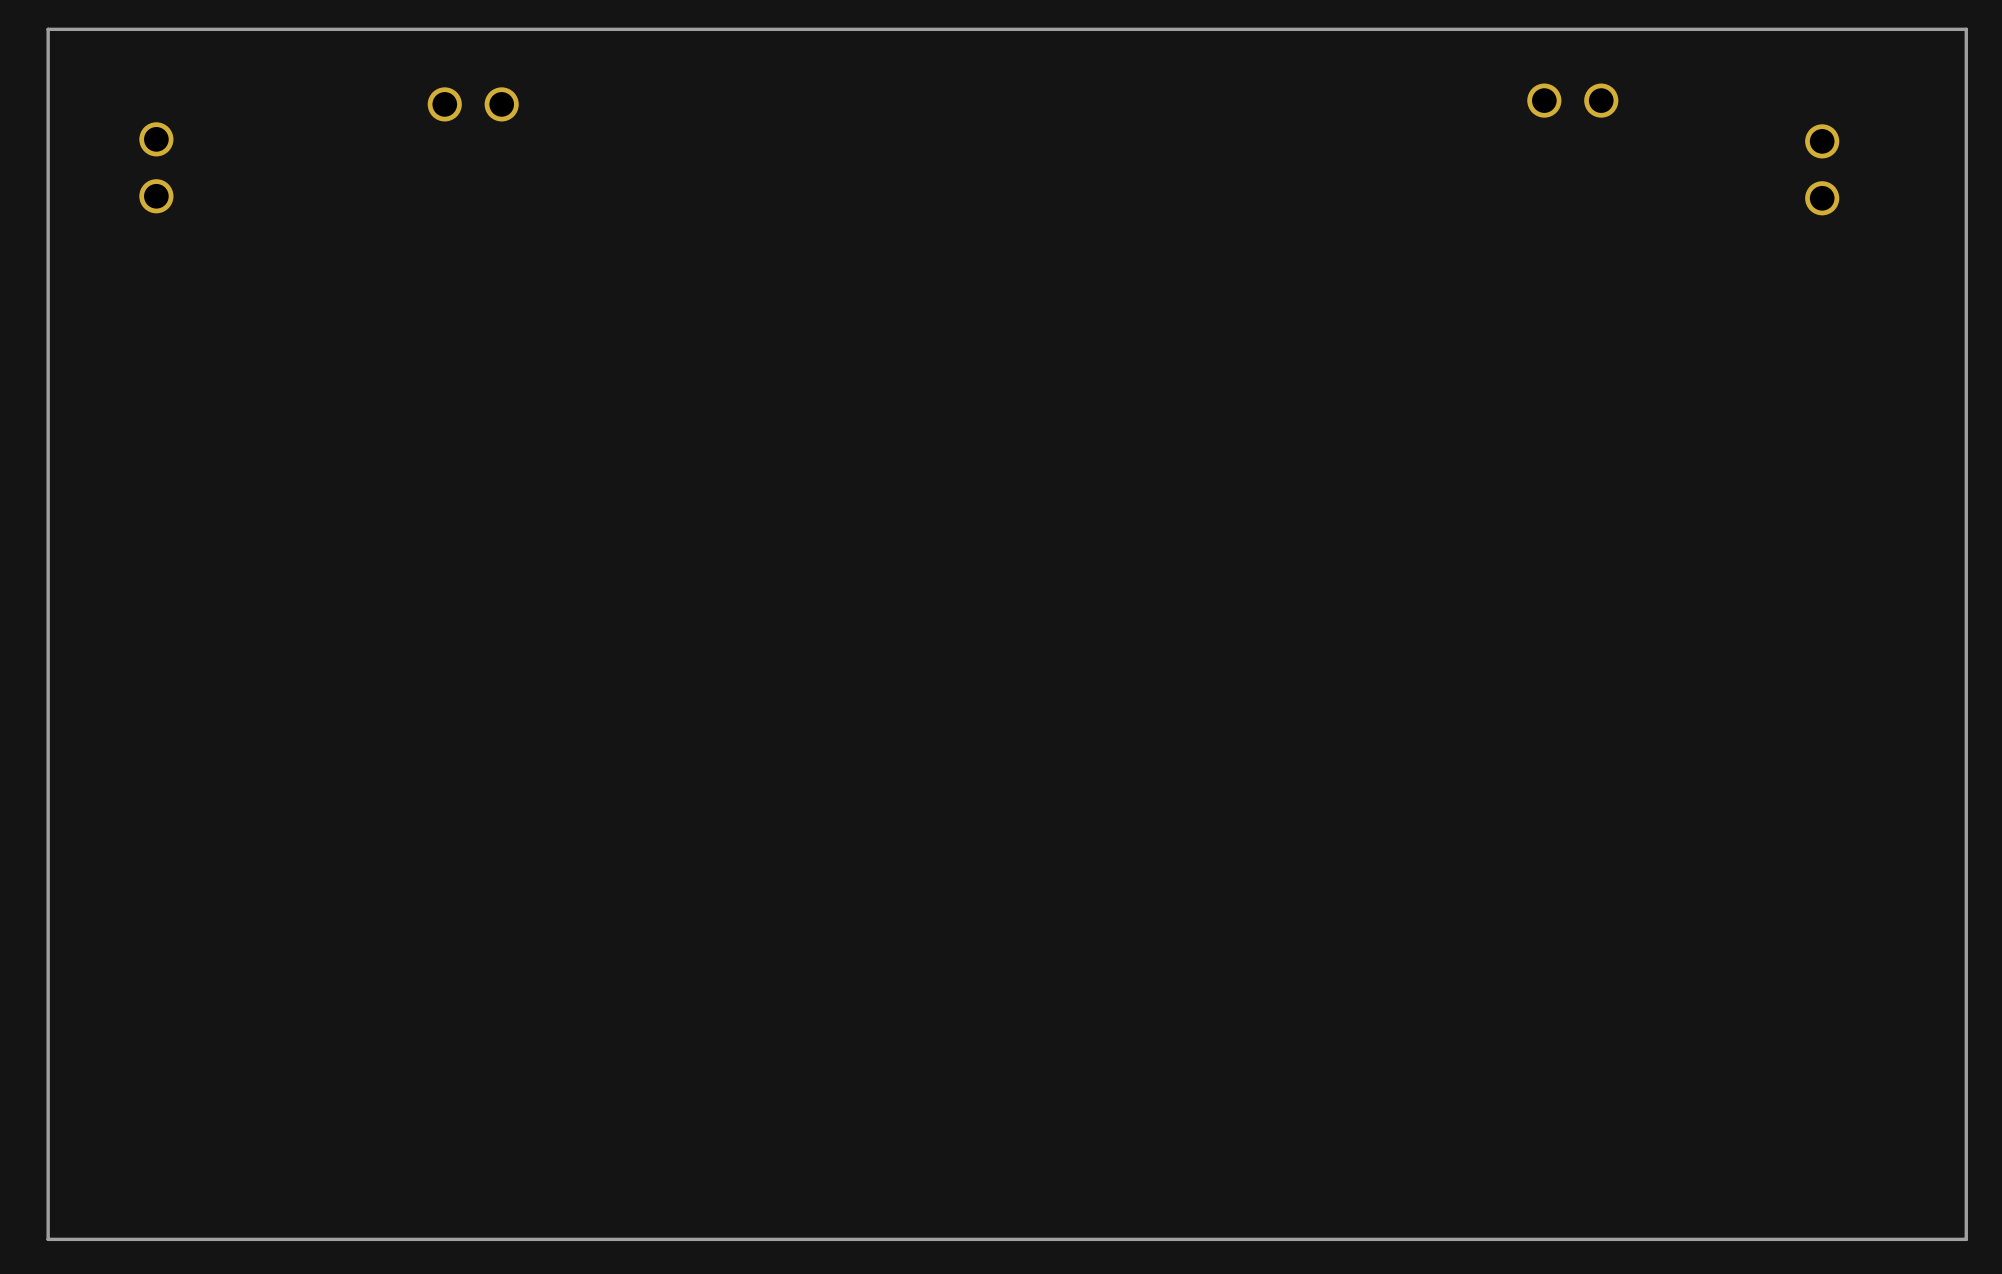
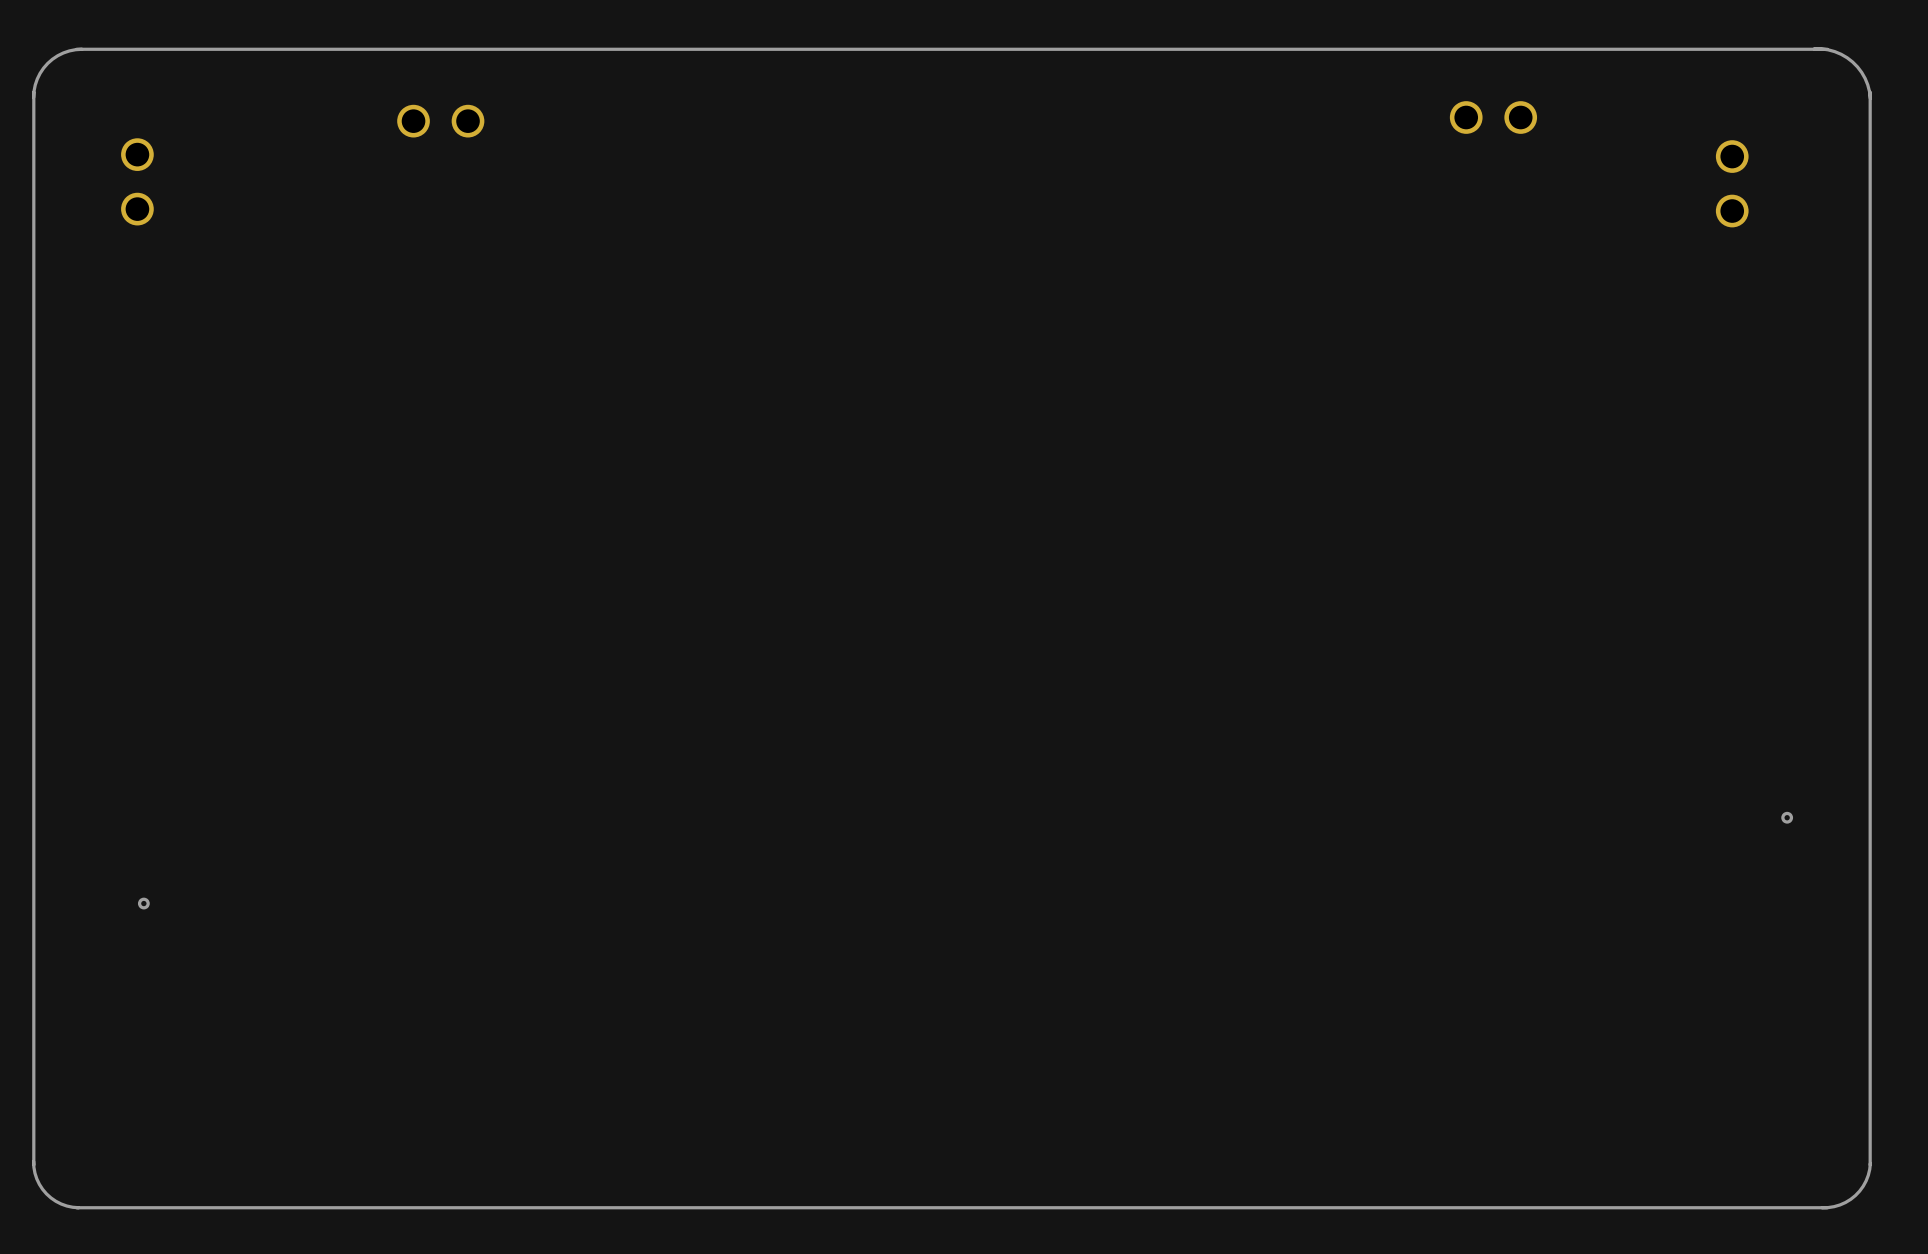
board edge: none -> (1814, 48) (1834, 51) (1852, 62) (1865, 78) (1870, 98)
board edge: (92, 29) (48, 29) (48, 74) -> none
board edge: none -> (81, 49) (63, 52) (47, 63) (37, 79) (33, 97)
board edge: (1921, 29) (1966, 29) (1966, 74) -> none
round board edge: none -> [1781, 811, 1794, 824]
round board edge: none -> [137, 897, 150, 910]
board edge: none -> (33, 1161) (36, 1178) (46, 1193) (61, 1204) (78, 1207)
board edge: none -> (1870, 1163) (1866, 1180) (1855, 1195) (1840, 1204) (1822, 1207)
board edge: (48, 1194) (48, 1239) (92, 1239) -> none
board edge: (1966, 1194) (1966, 1239) (1921, 1239) -> none

